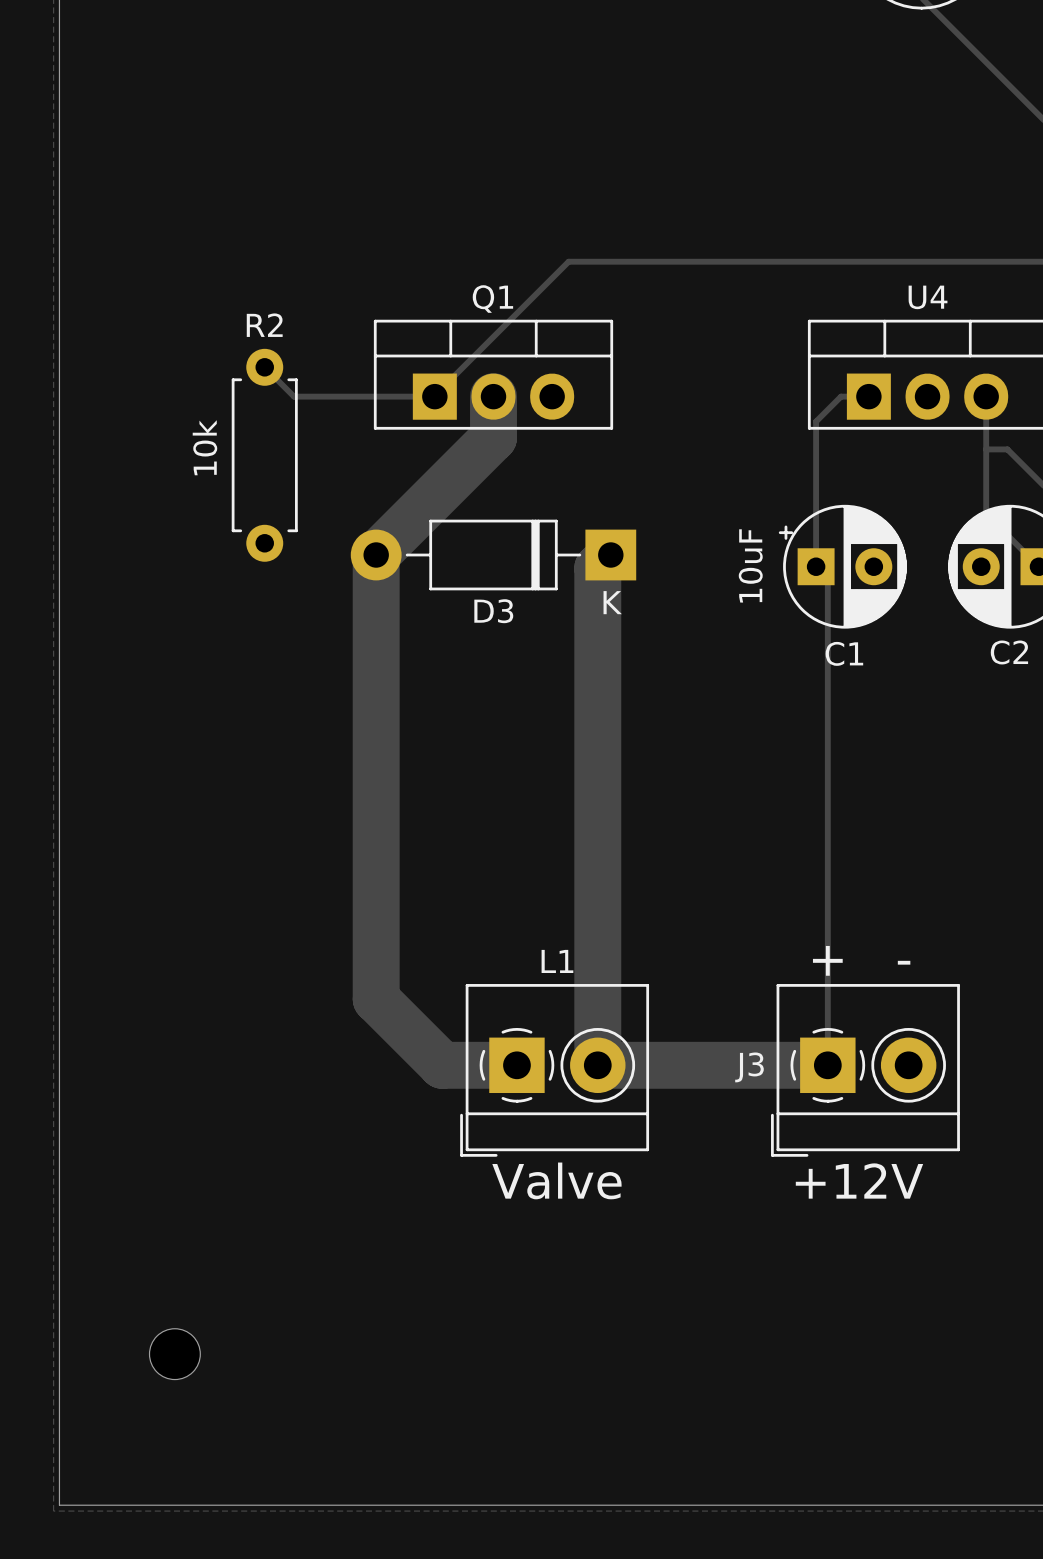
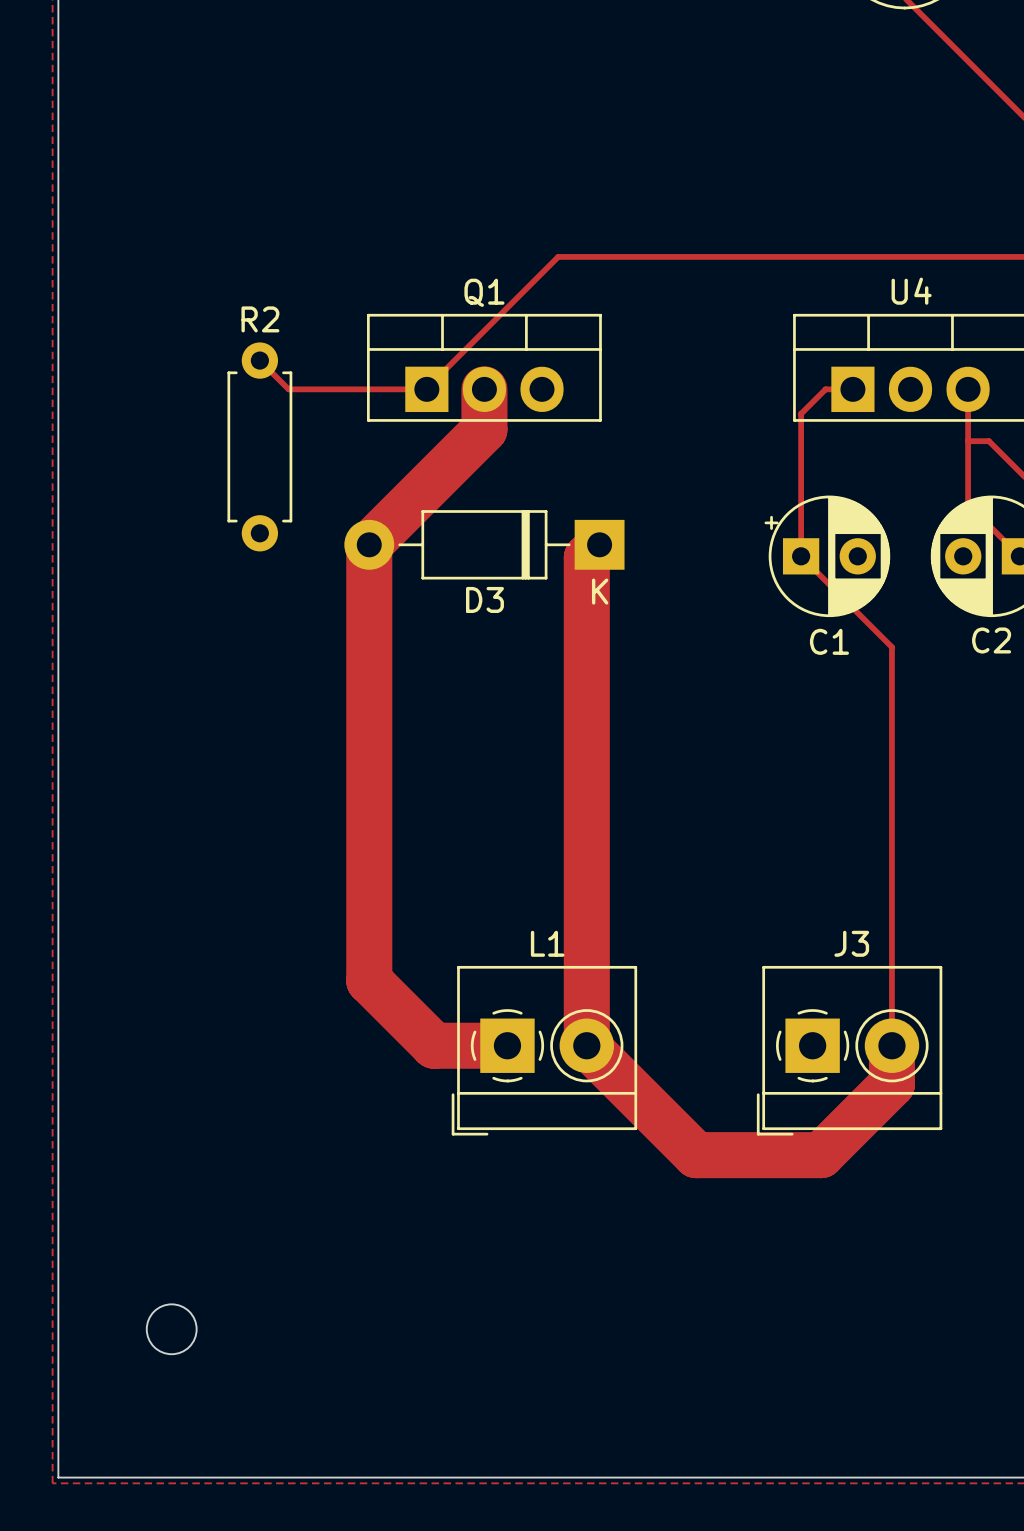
R2 value: 10k (204, 447) -> none
C1 value: 10uF (750, 565) -> none
track: (827, 578) (827, 1065) (597, 1065) -> (812, 567) (891, 647) (891, 1084) (821, 1155) (696, 1155) (586, 1045)
text: + (827, 960) -> none
text: - (904, 962) -> none
J3 name position: J3 (749, 1067) -> J3 (851, 943)
text: Valve (556, 1180) -> none
text: +12V (859, 1181) -> none

